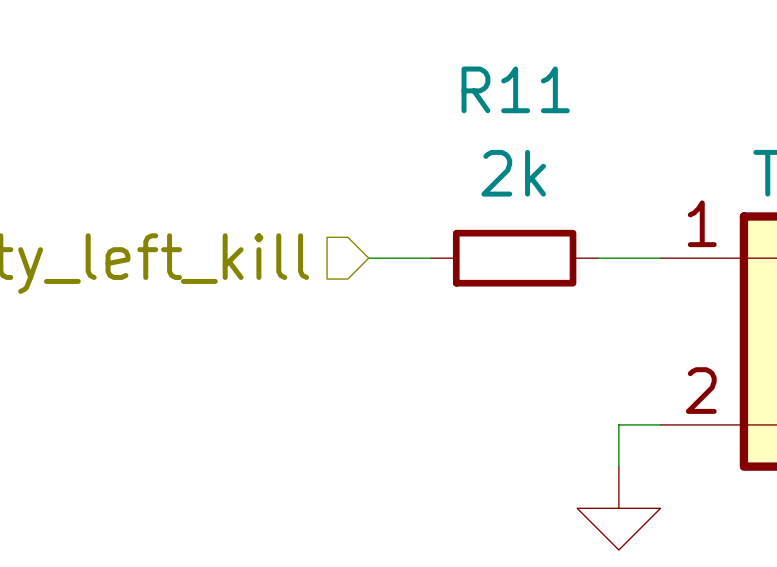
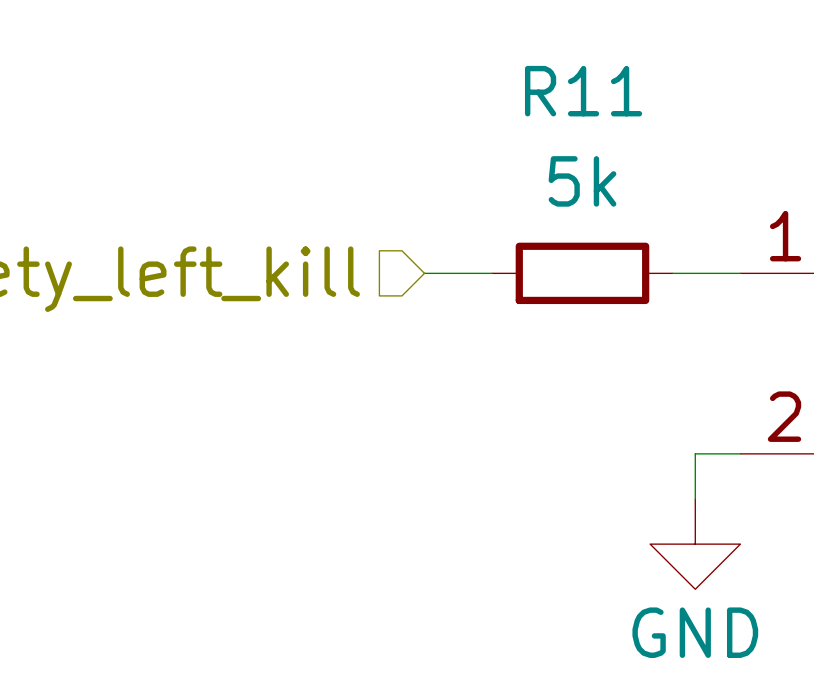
R11 value: 2k (513, 173) -> 5k (582, 181)

